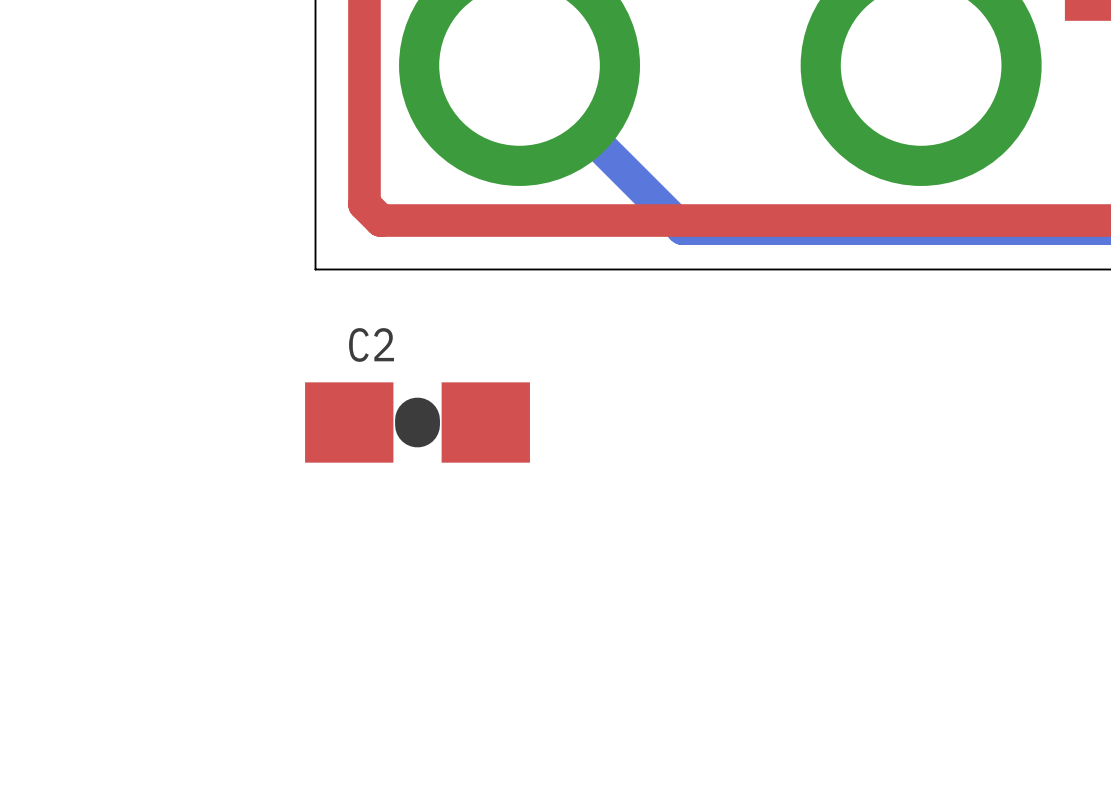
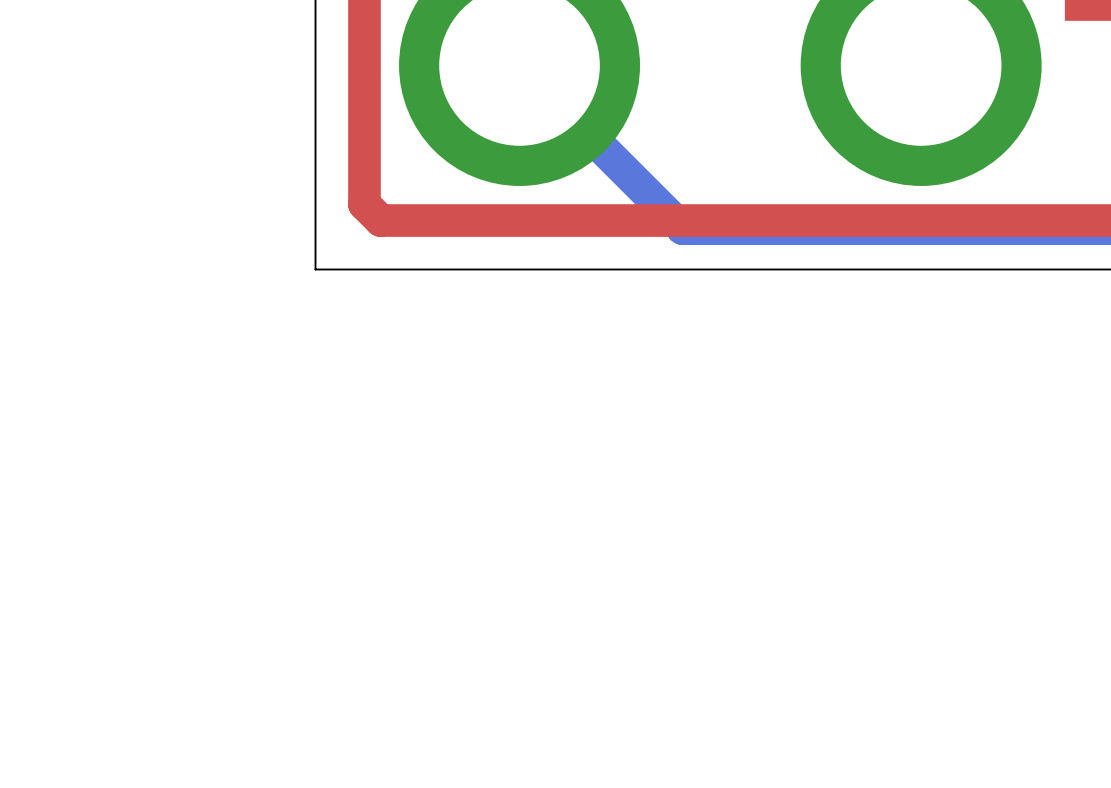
C2: (417, 422) -> none

